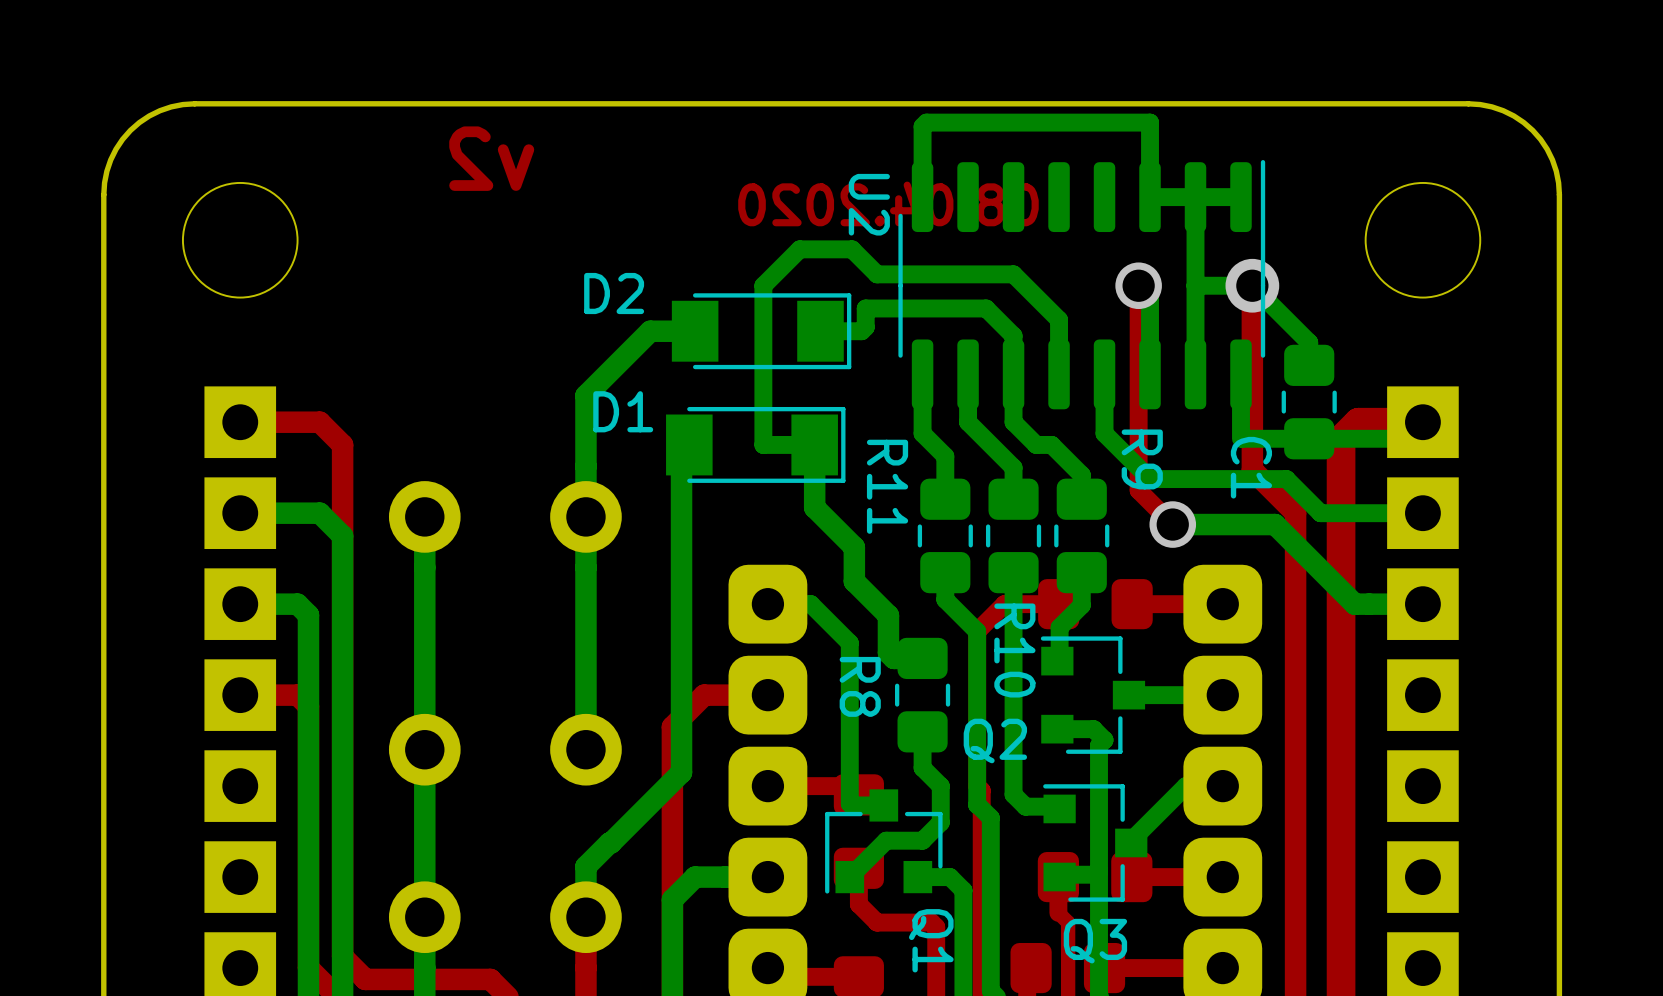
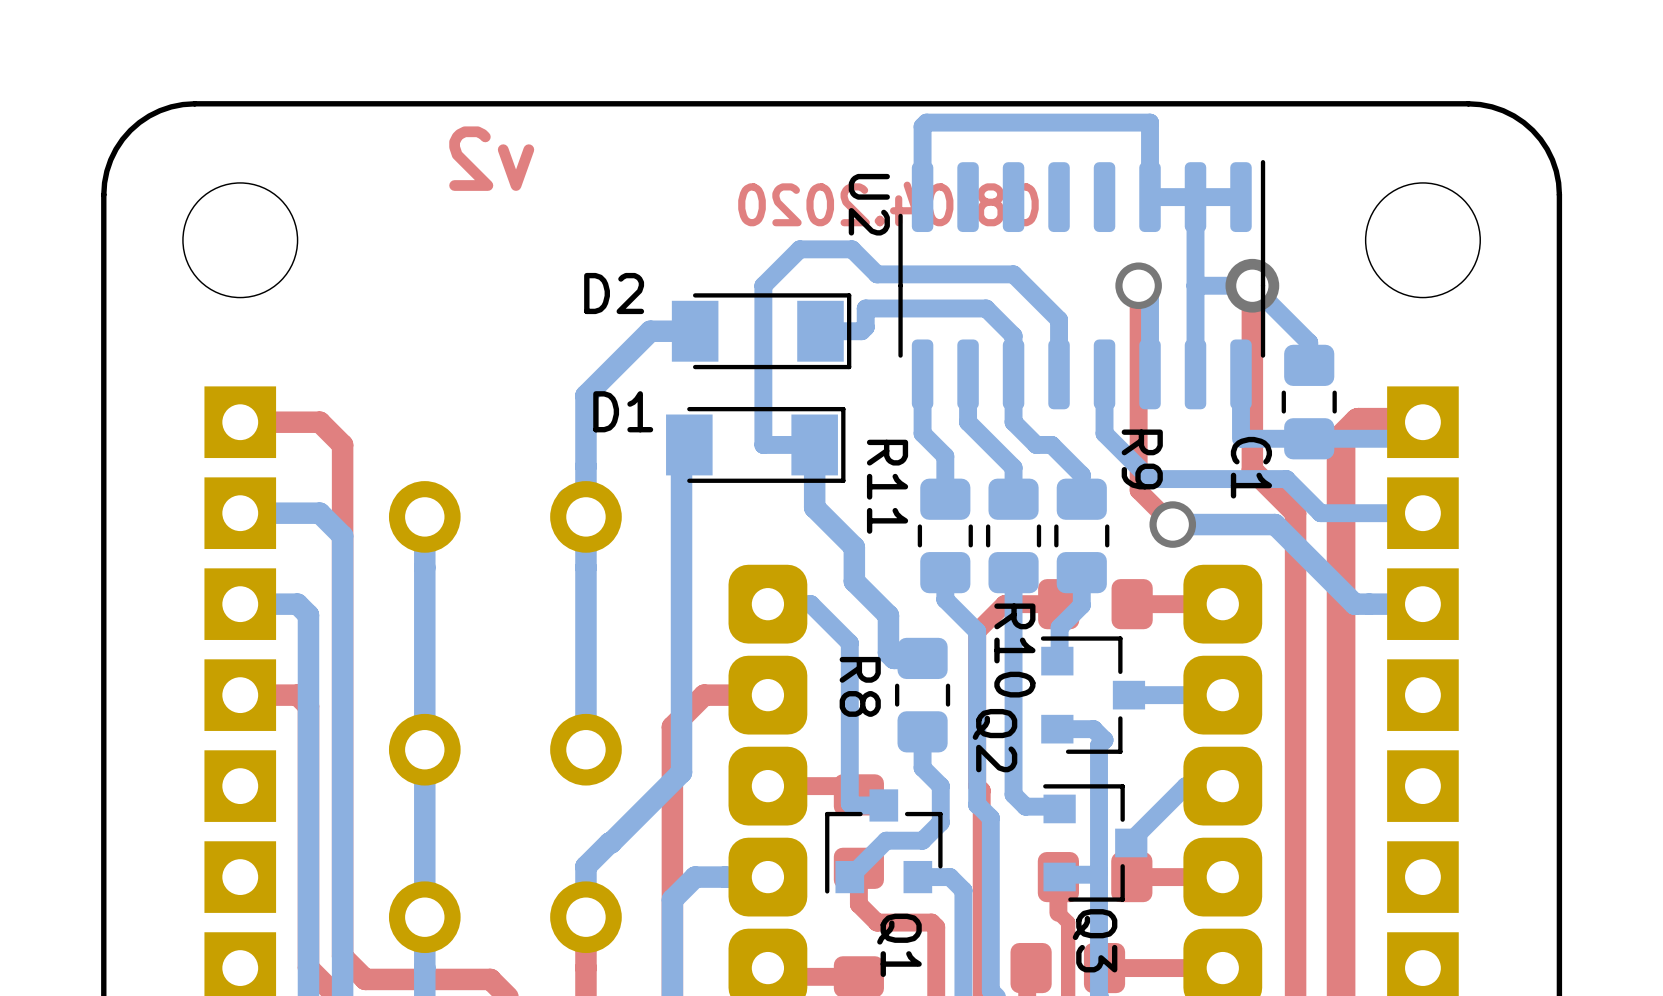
Q2 name rotation: 0° (995, 740) -> 90° clockwise (994, 740)
Q1 name position: Q1 (931, 940) -> Q1 (899, 945)
Q3 name rotation: 0° (1095, 941) -> 90° clockwise (1095, 940)

